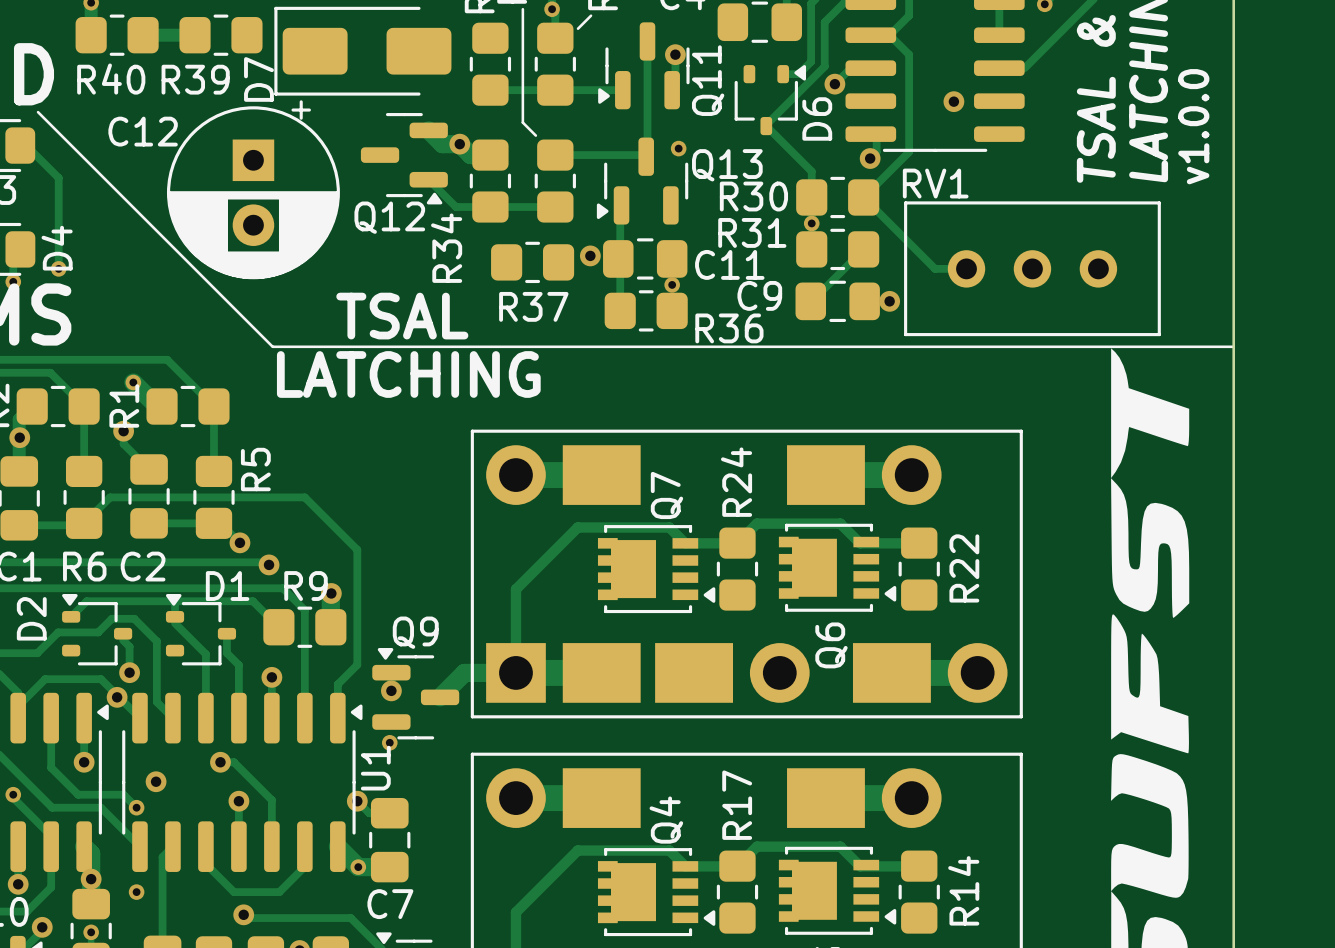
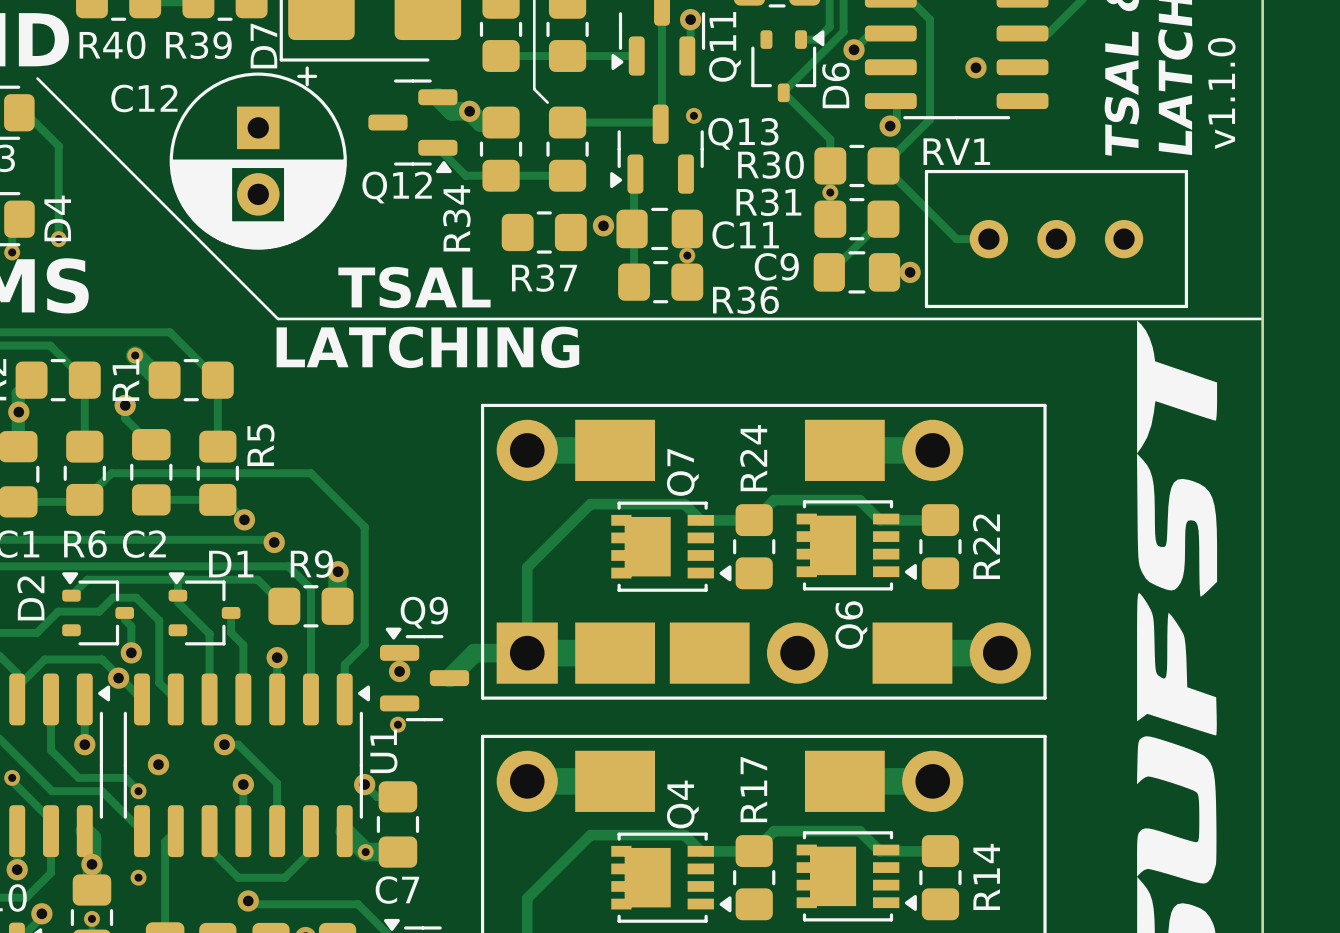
text: v1.0.0 (1193, 126) -> v1.1.0 (1221, 93)

